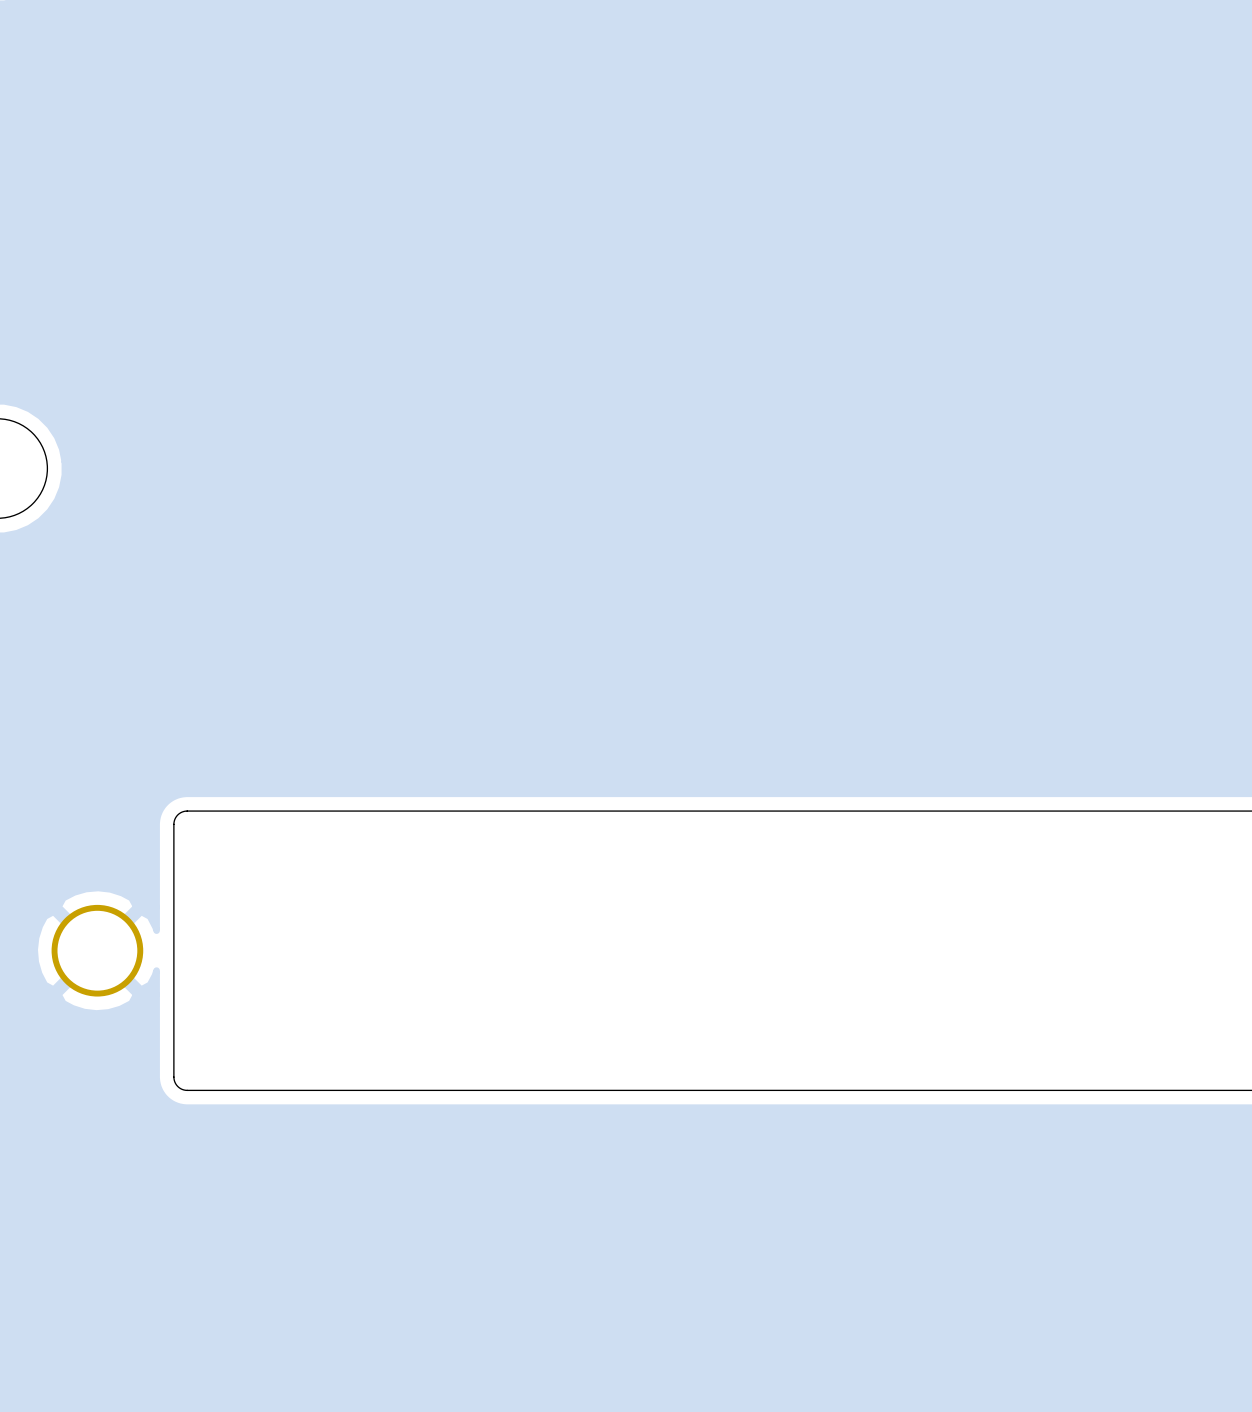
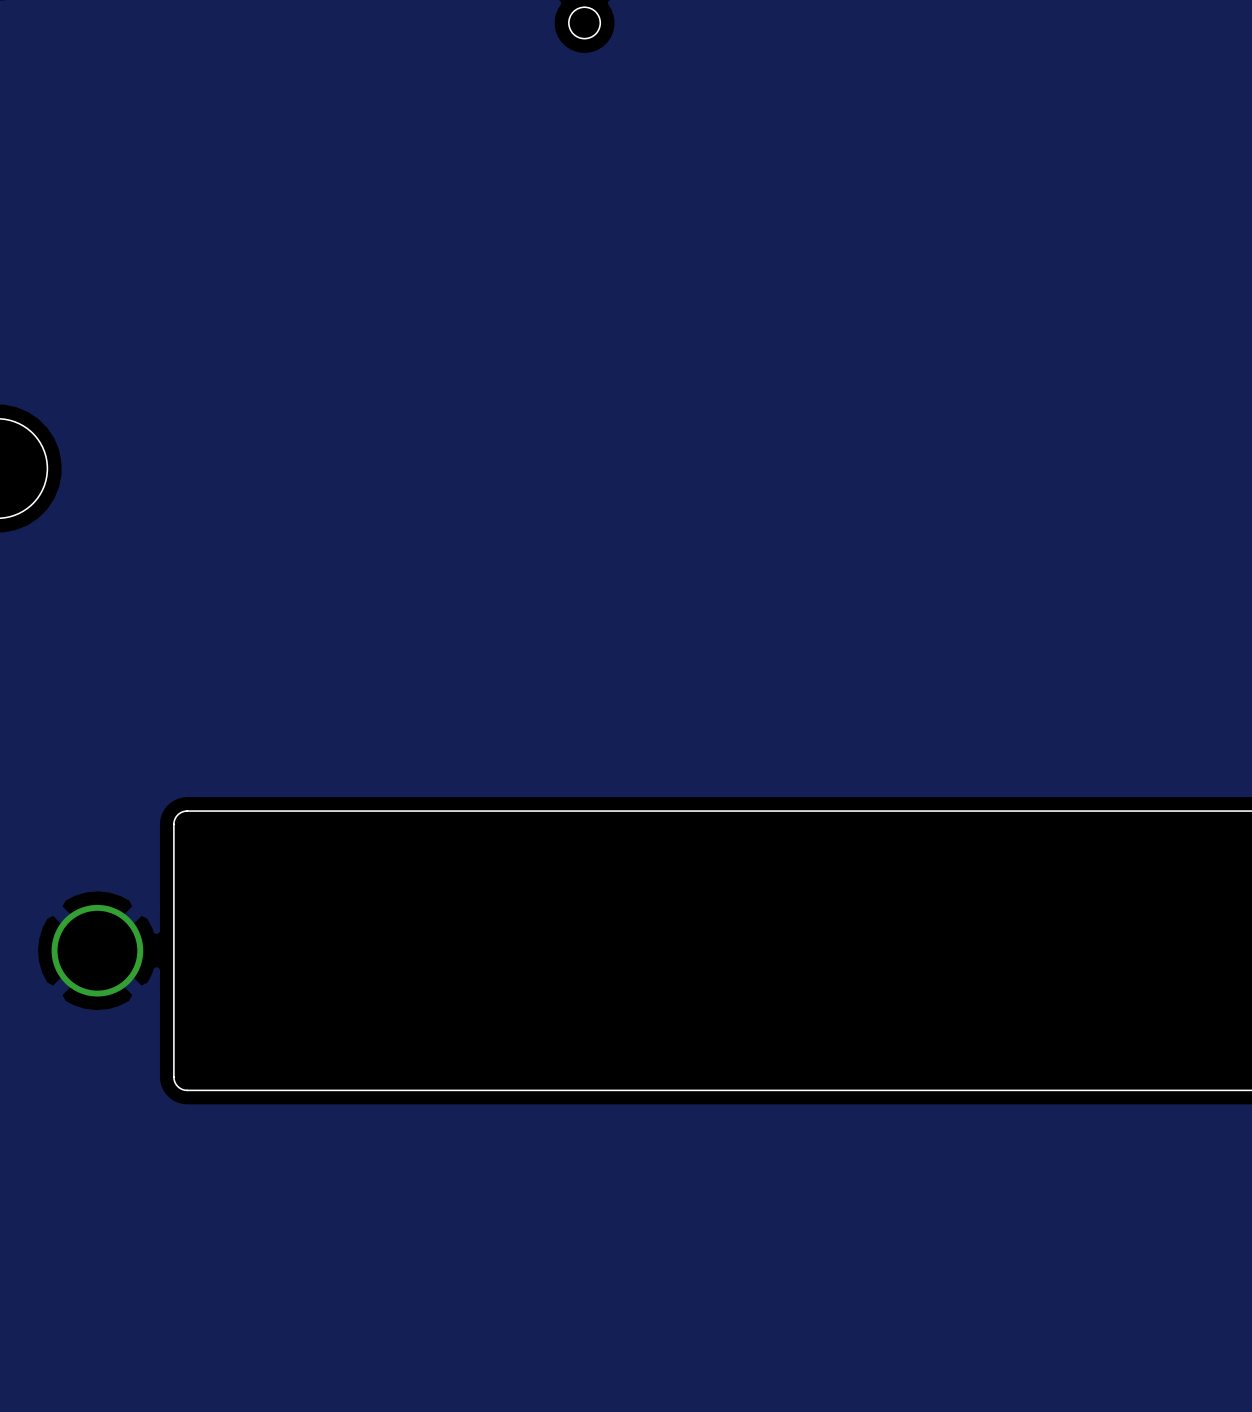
round board edge: none -> [568, 6, 601, 40]

